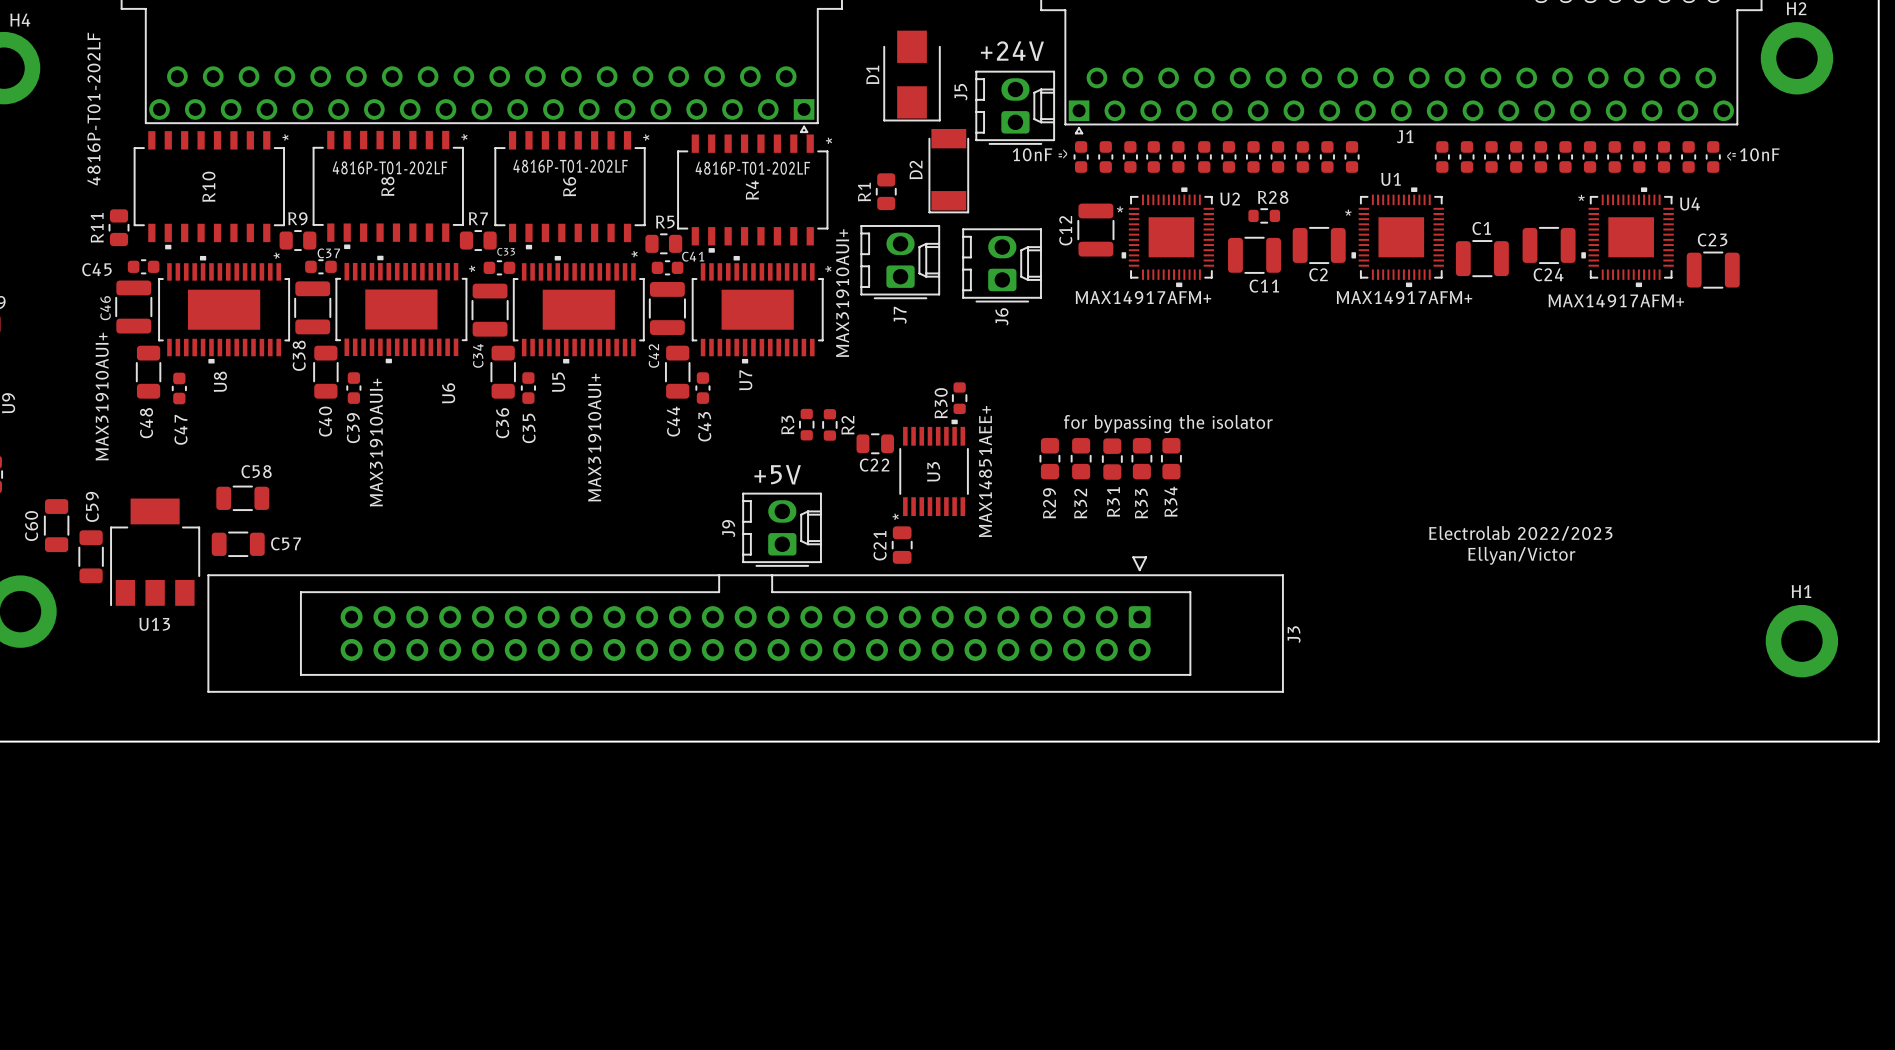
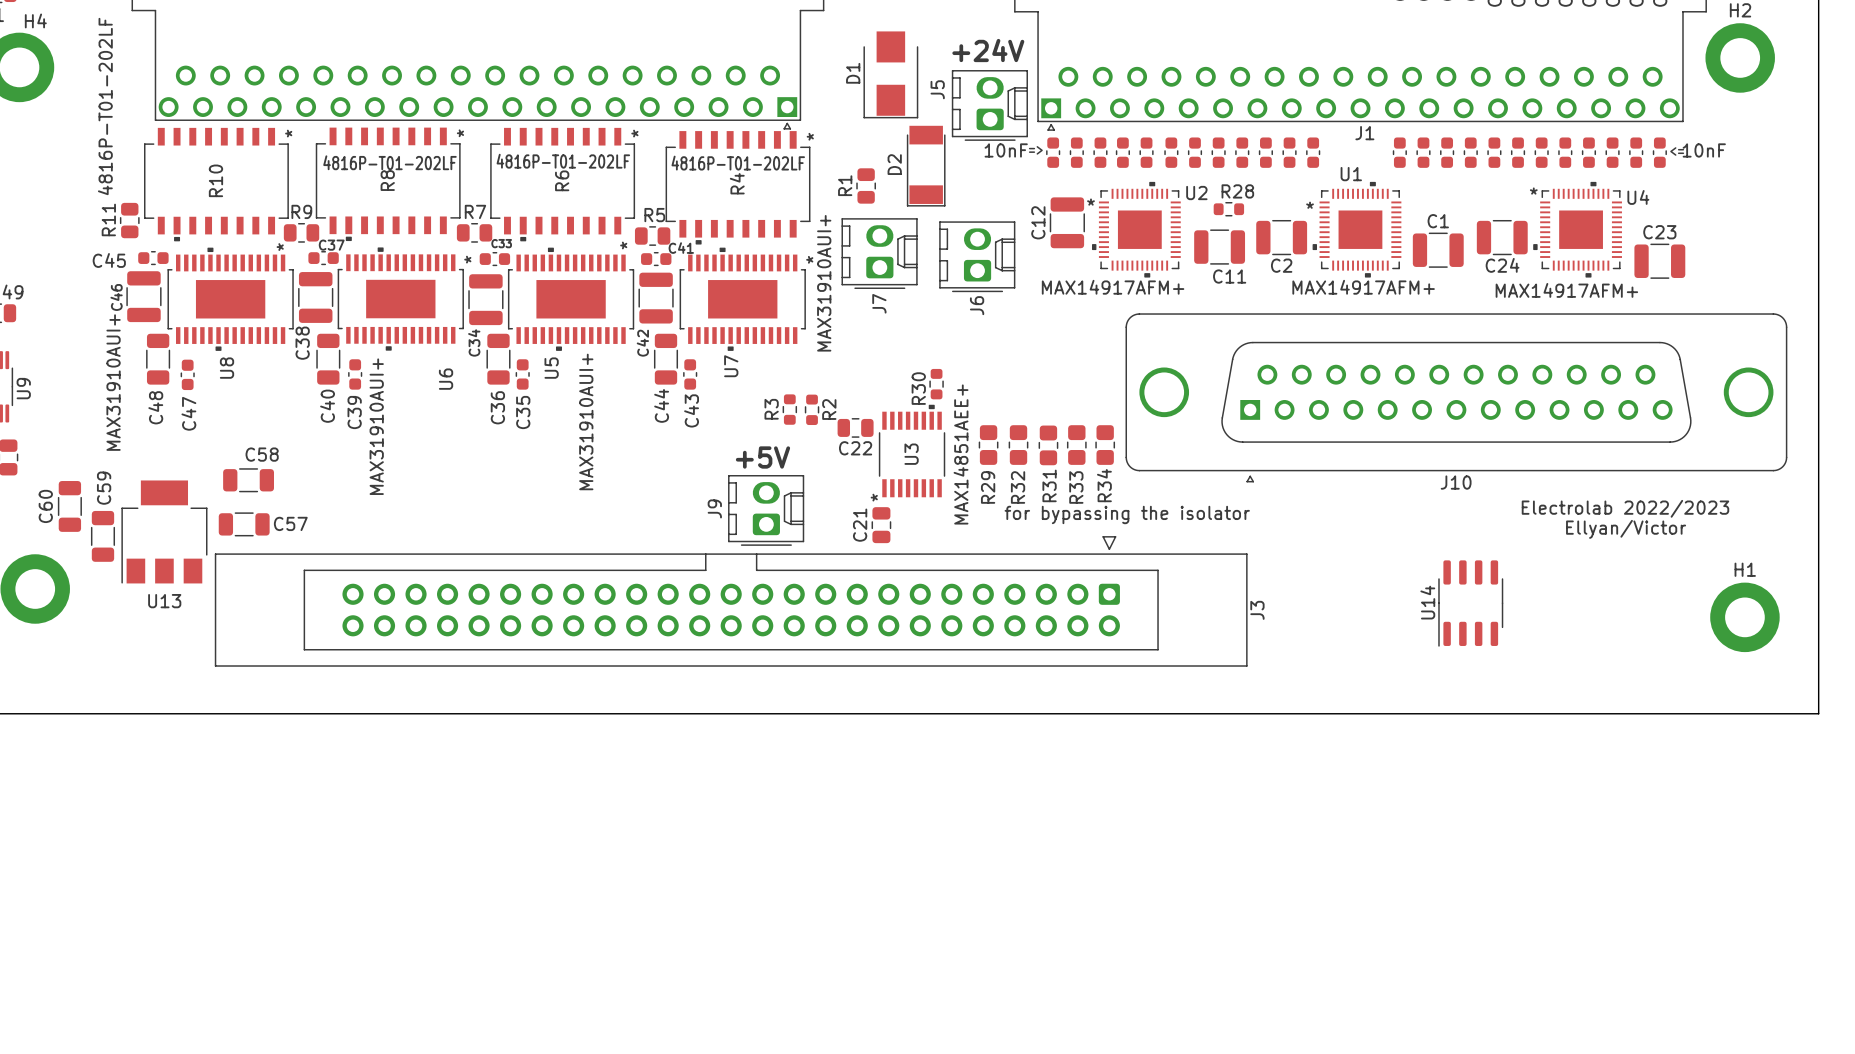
J10: none -> (1456, 397)
text position: for bypassing the isolator (1168, 424) -> for bypassing the isolator (1127, 514)
R29 position: (1049, 458) -> (988, 445)
R32 position: (1081, 458) -> (1018, 445)
R33 position: (1141, 458) -> (1076, 445)
R34 position: (1171, 458) -> (1105, 445)
R31 position: (1112, 459) -> (1048, 445)
text position: Electrolab 2022/2023 (1520, 533) -> Electrolab 2022/2023 (1625, 508)
text position: Ellyan/Victor (1521, 555) -> Ellyan/Victor (1626, 529)
U14: none -> (1470, 603)

